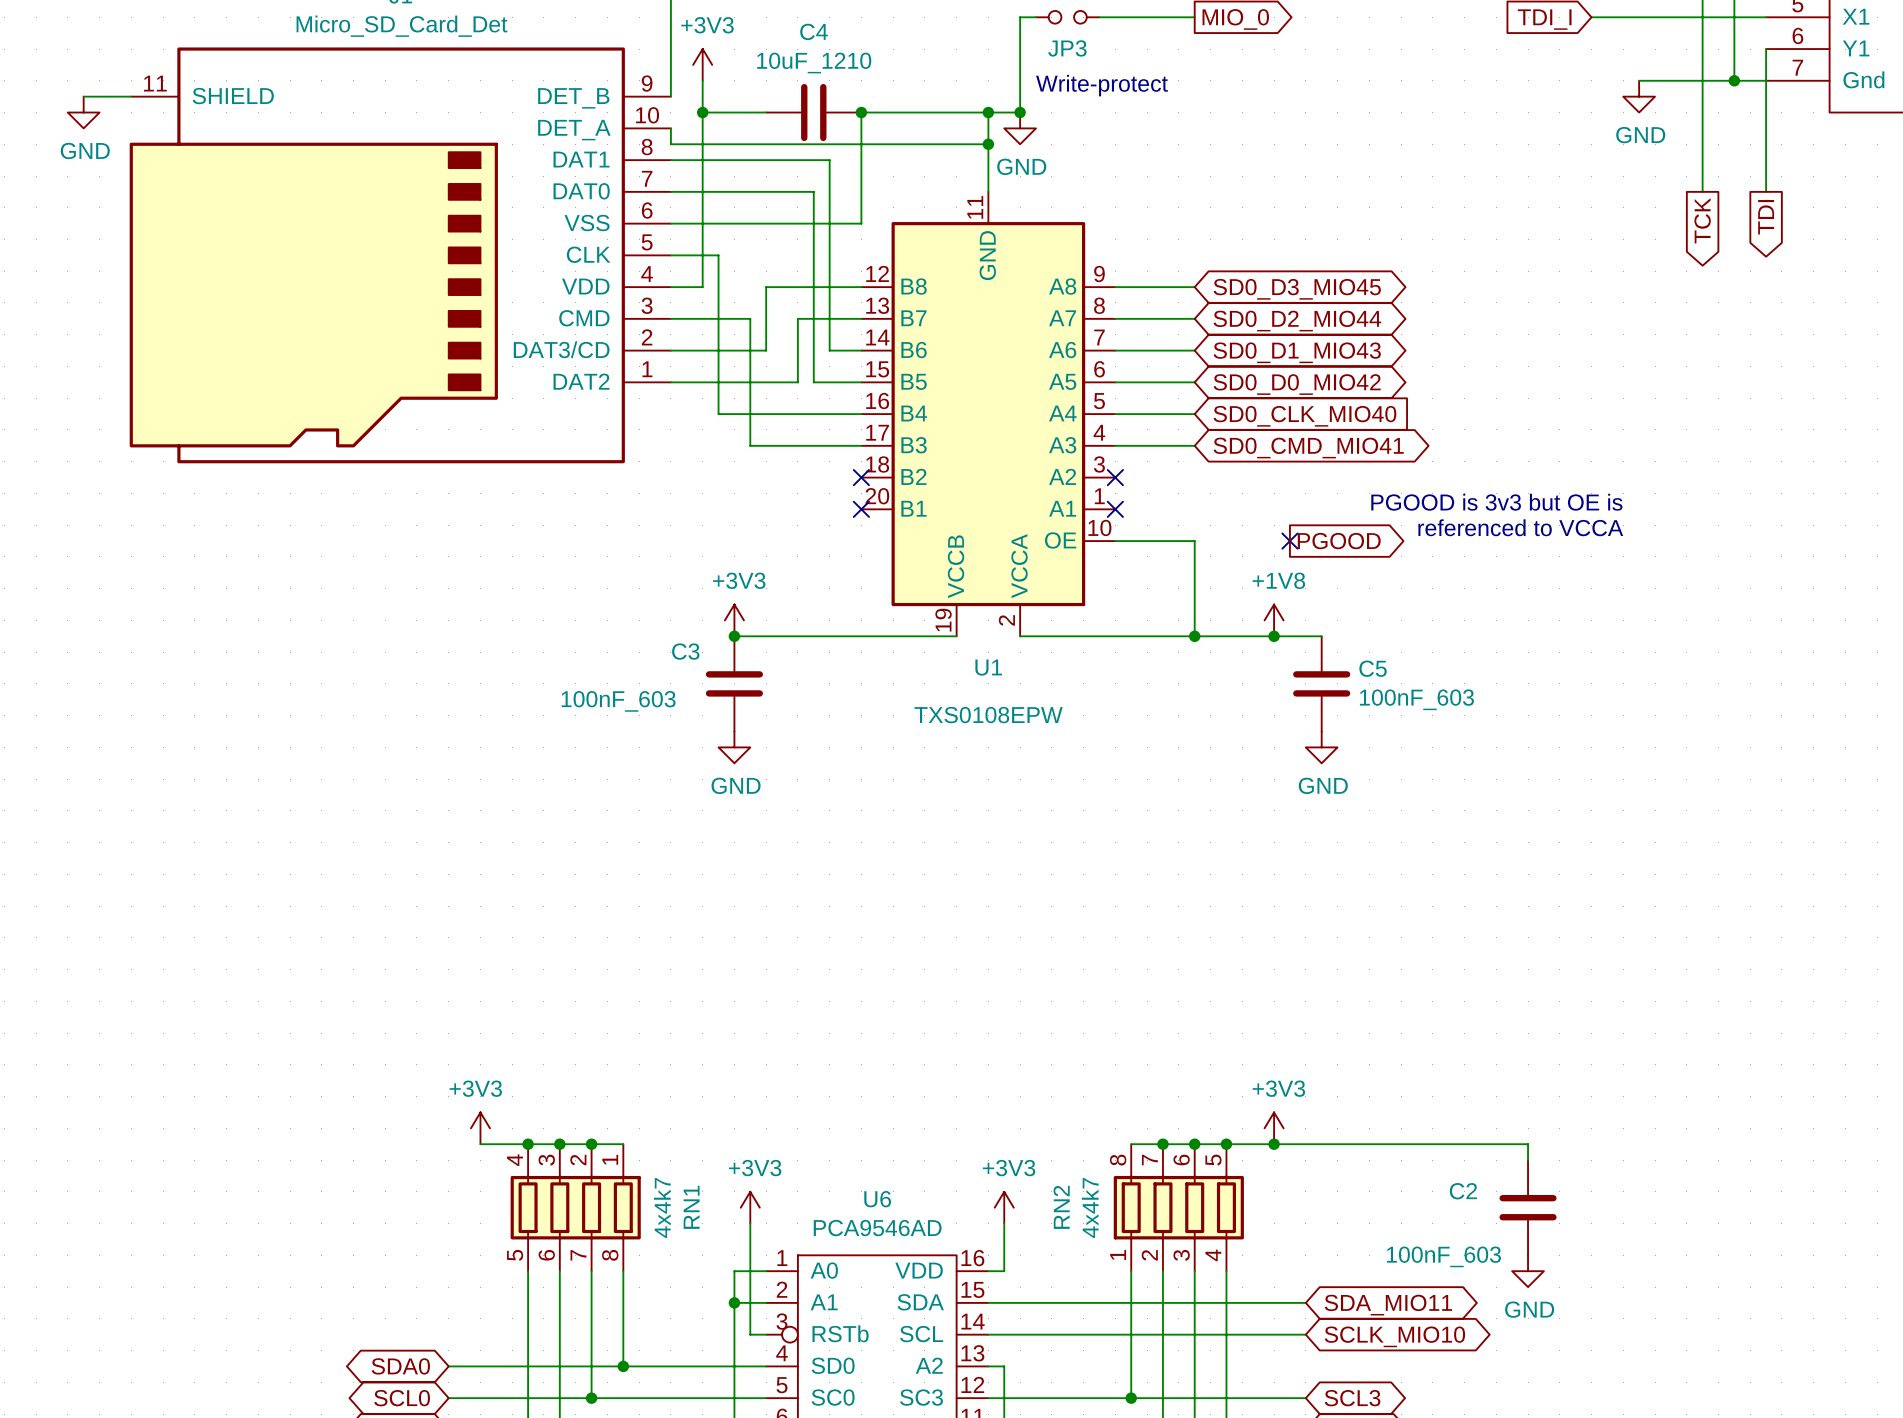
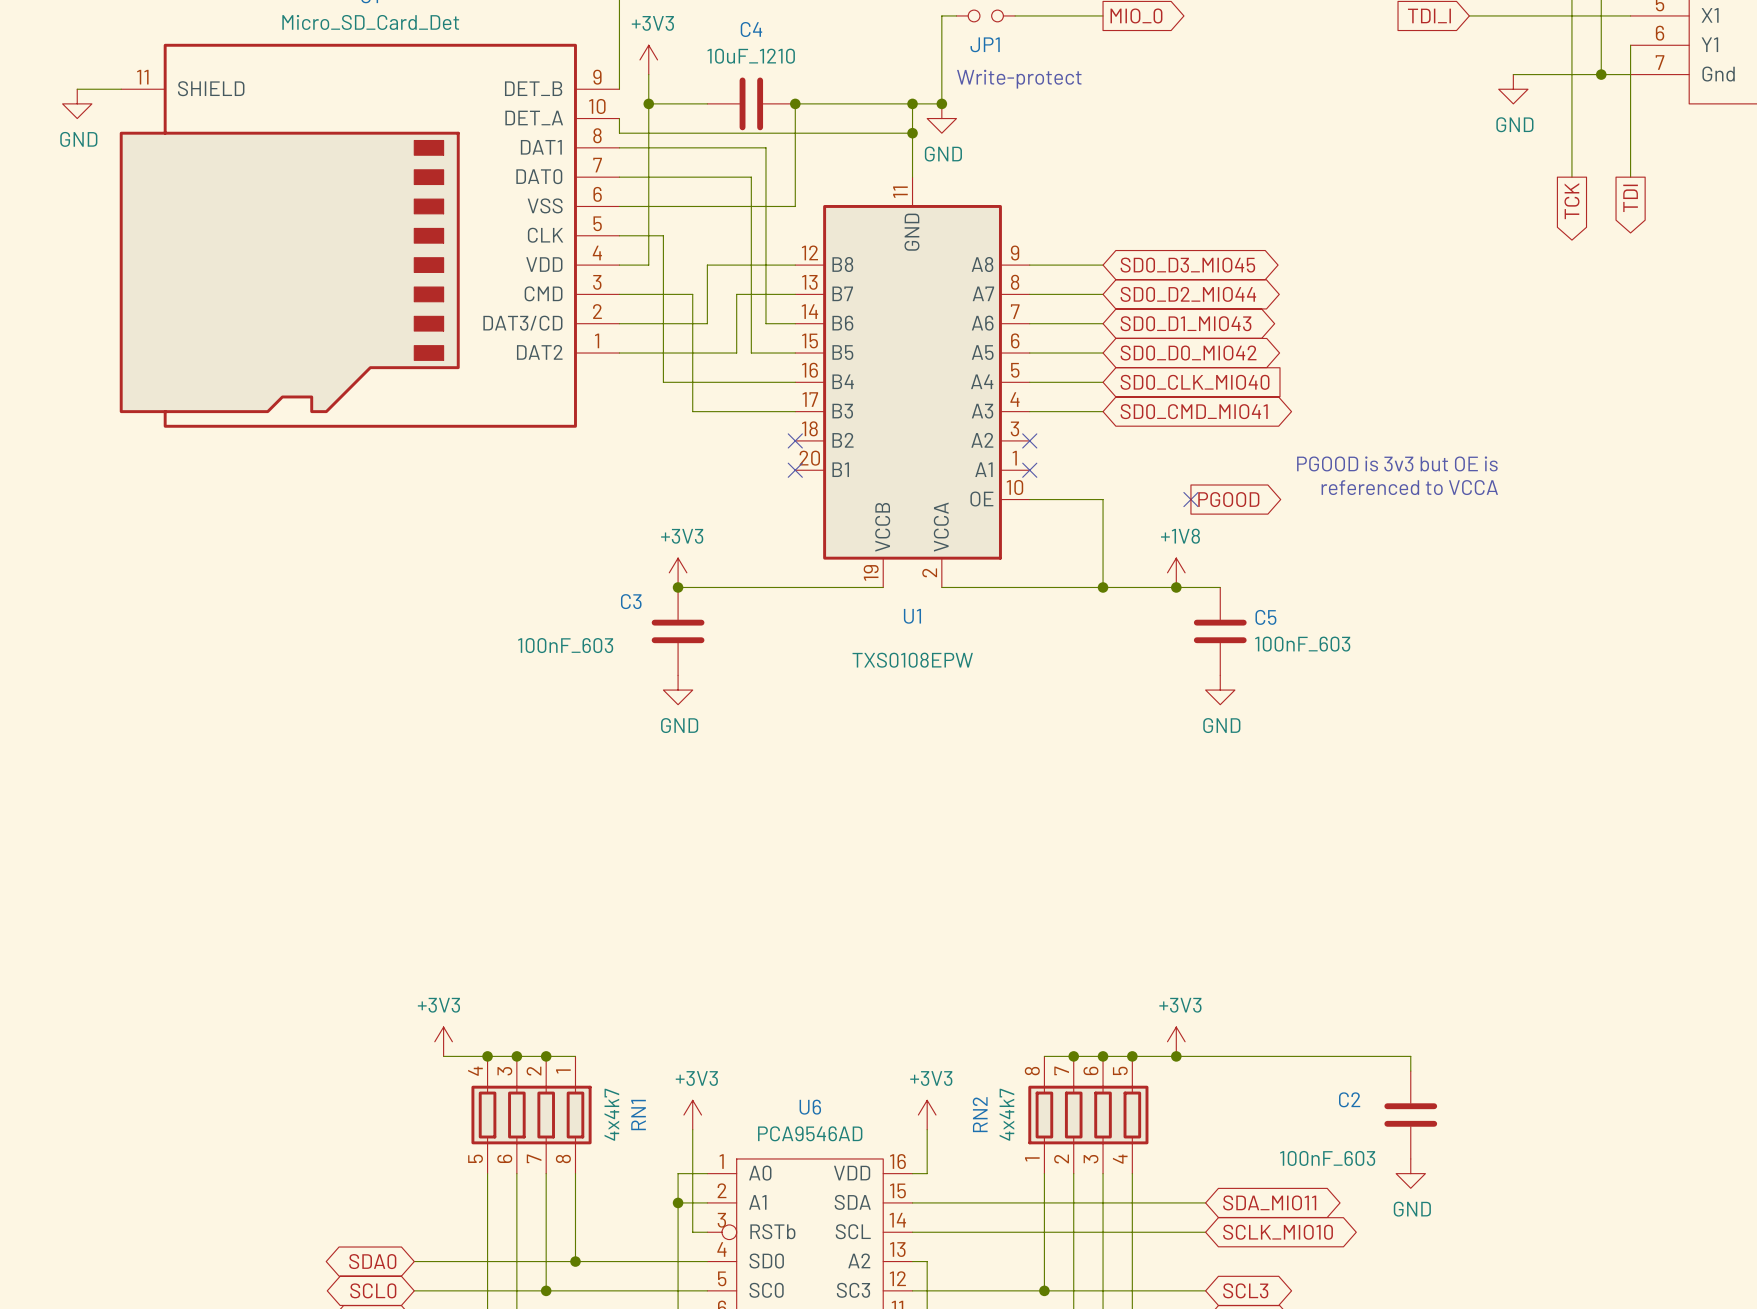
JP3 name: JP3 (1067, 48) -> JP1 (985, 44)

